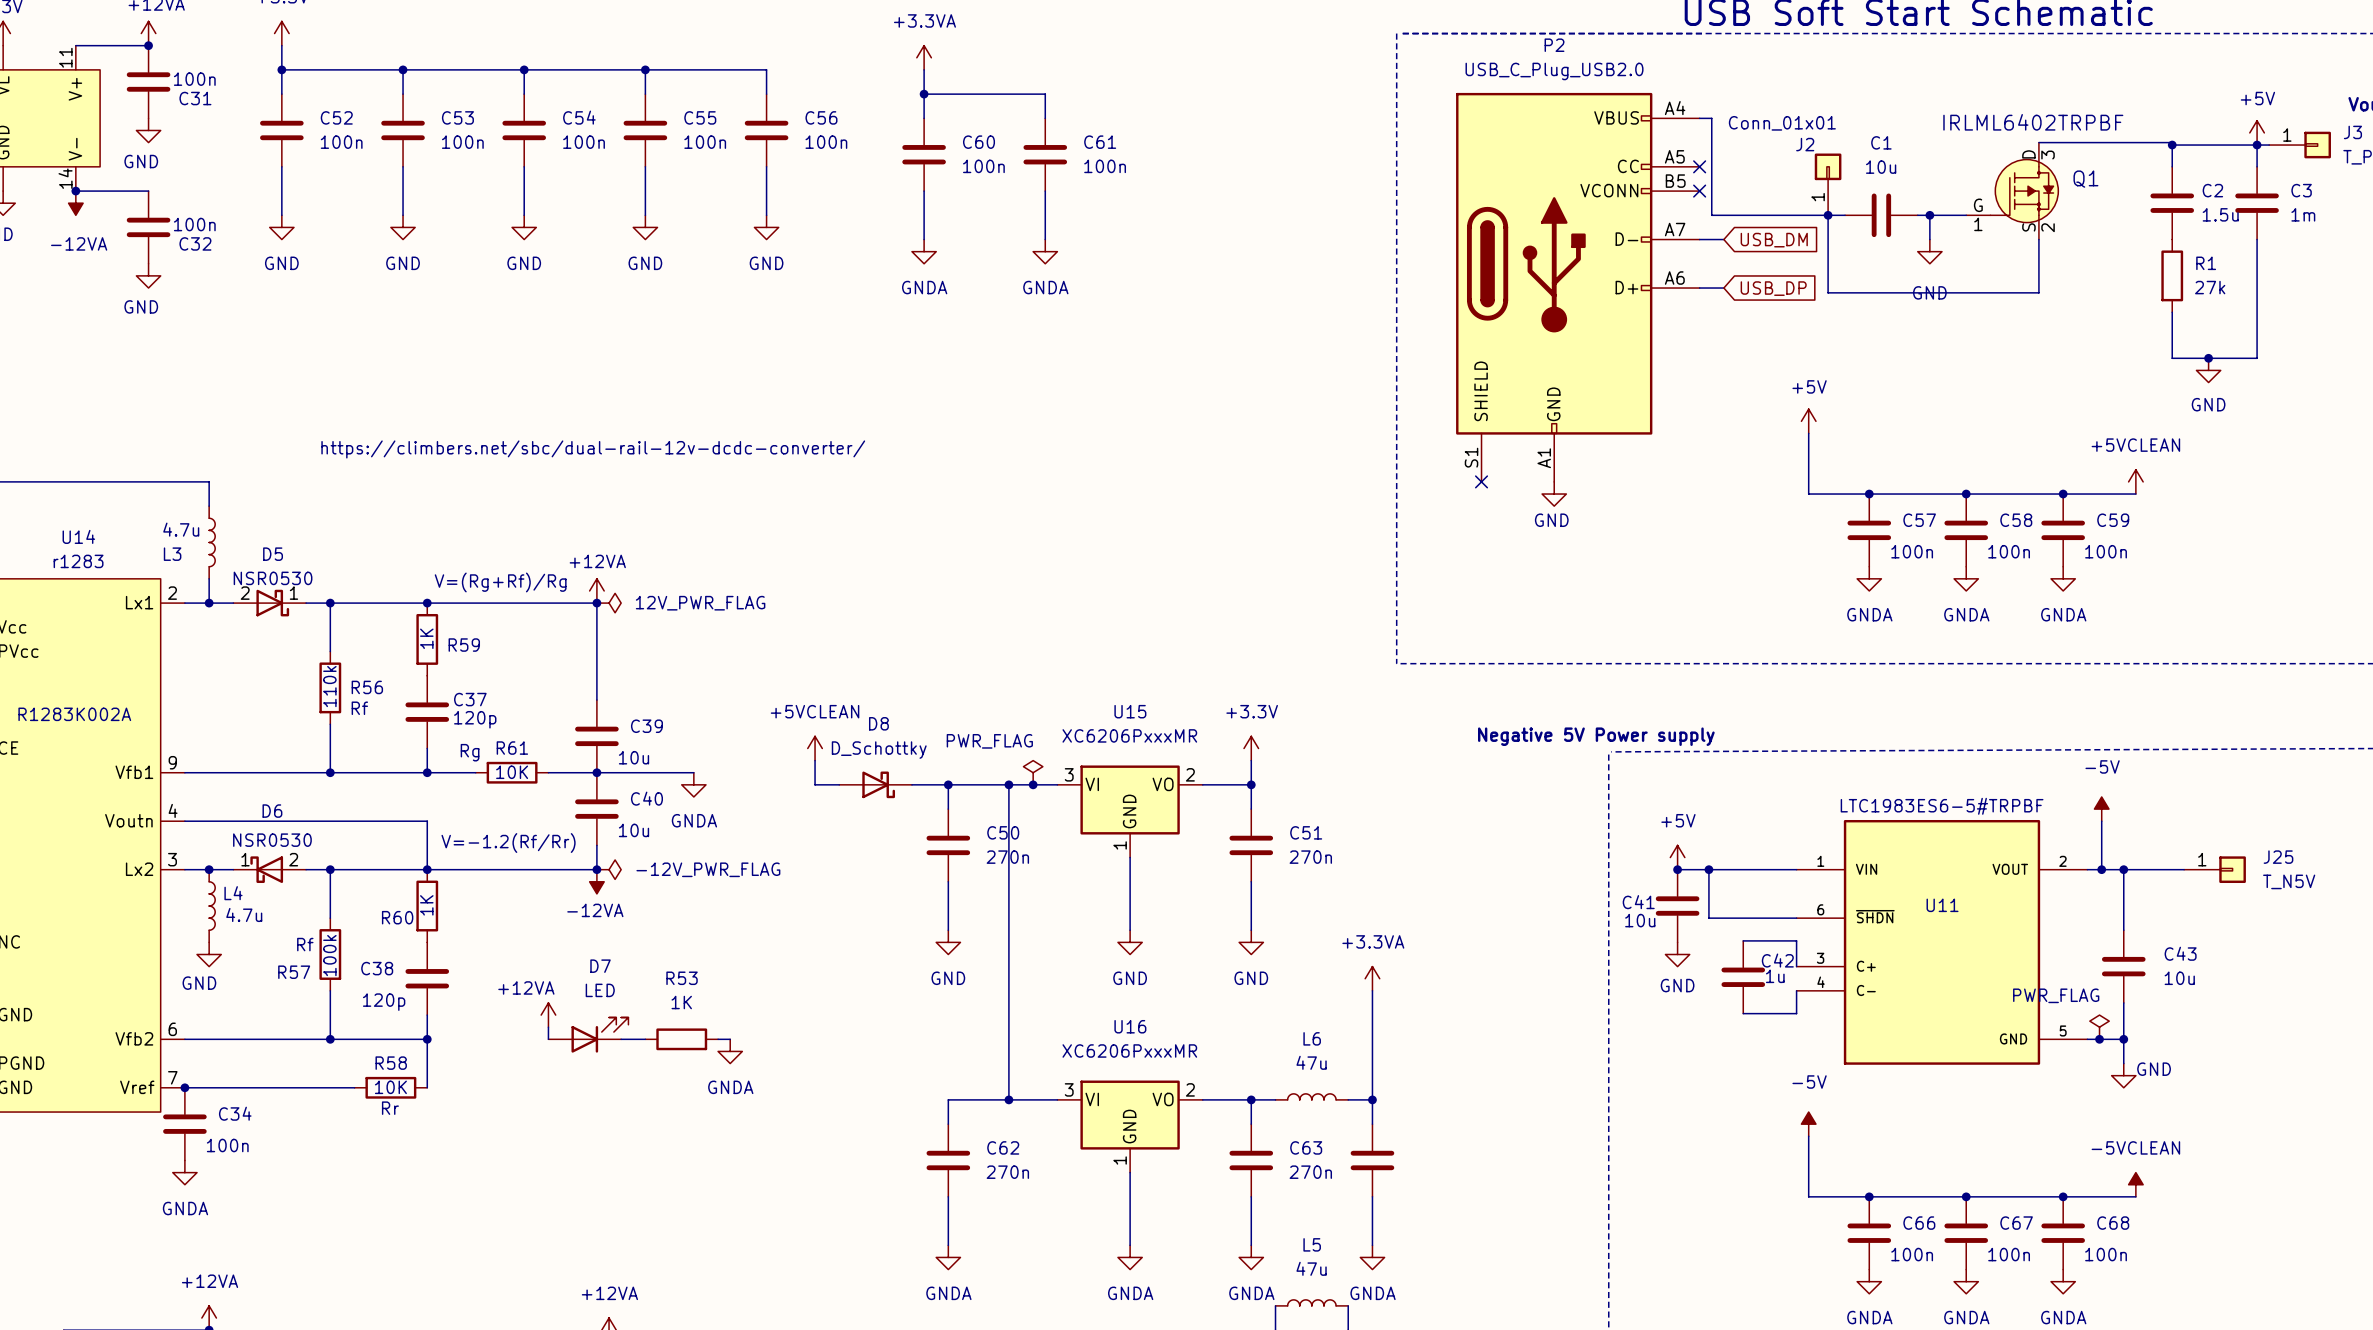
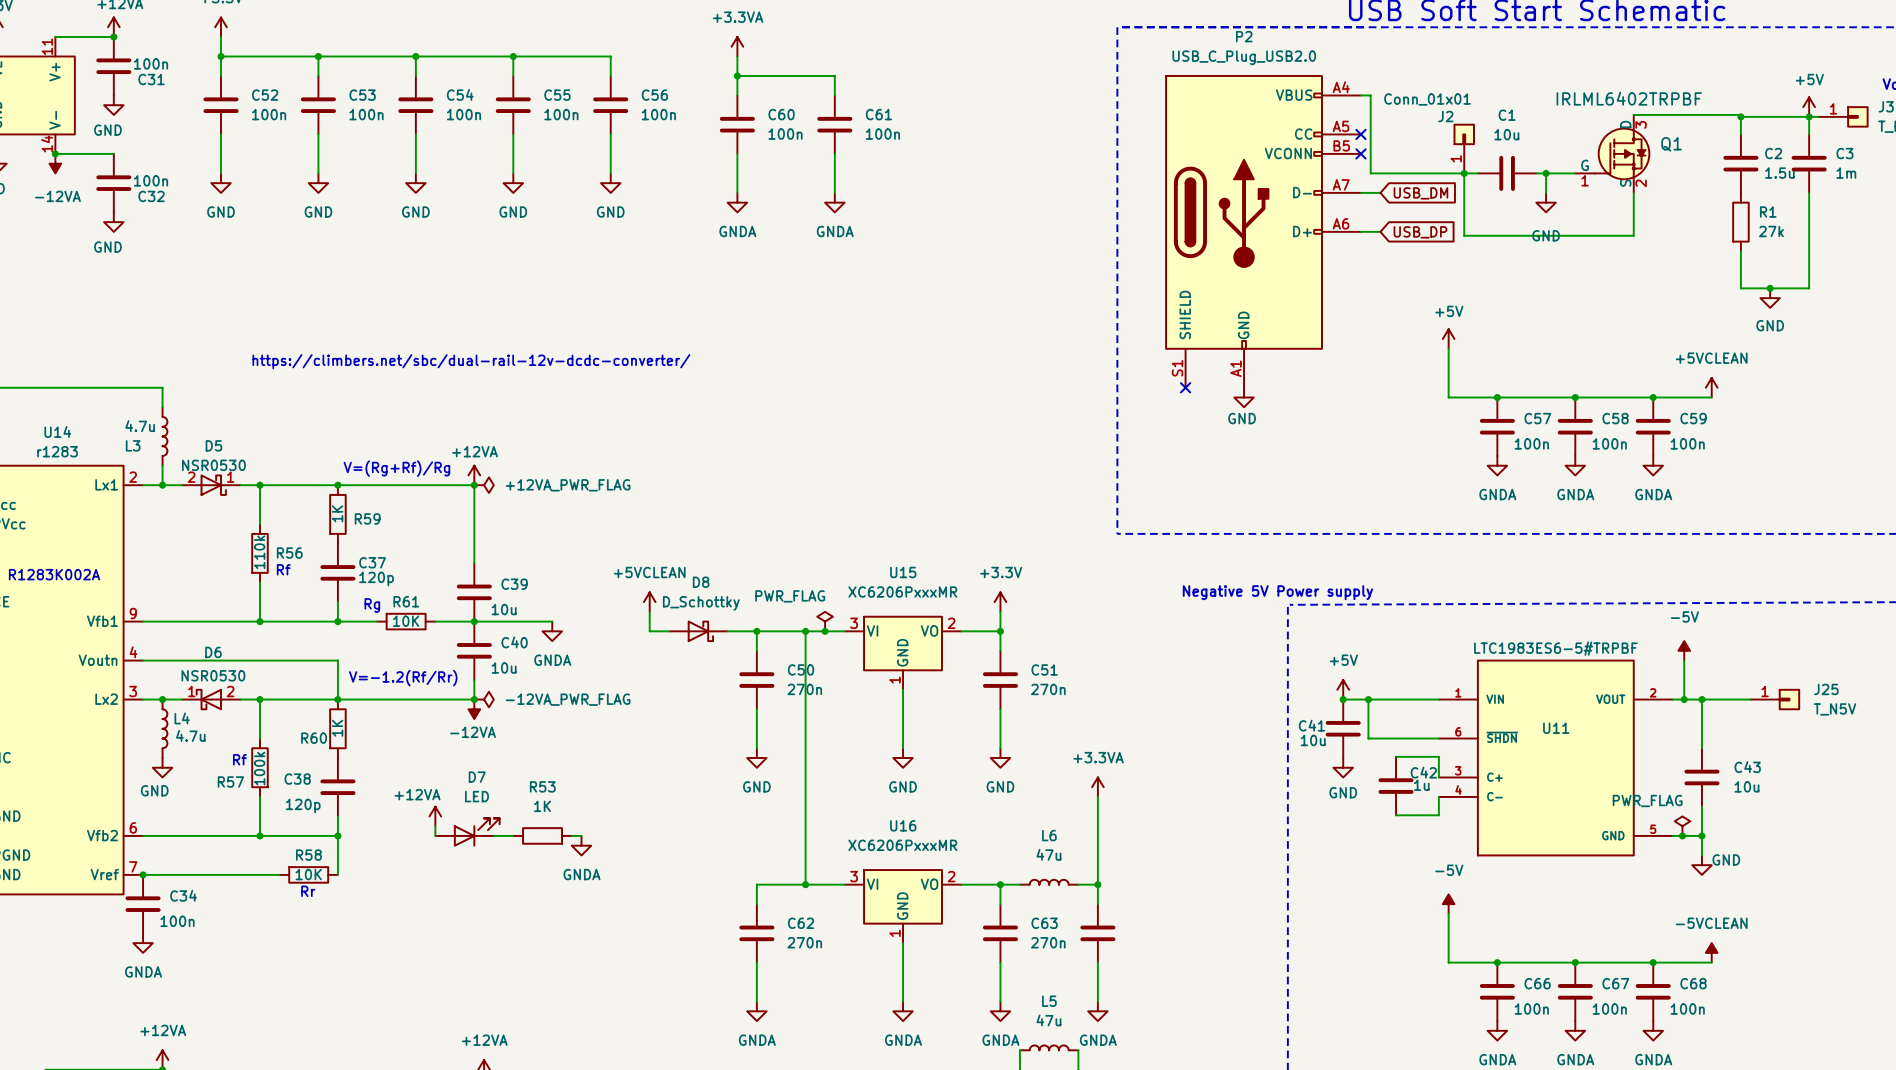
power symbol: 12V_PWR_FLAG (609, 603) -> +12VA_PWR_FLAG (484, 485)
power symbol: -12V_PWR_FLAG (609, 869) -> -12VA_PWR_FLAG (484, 699)

